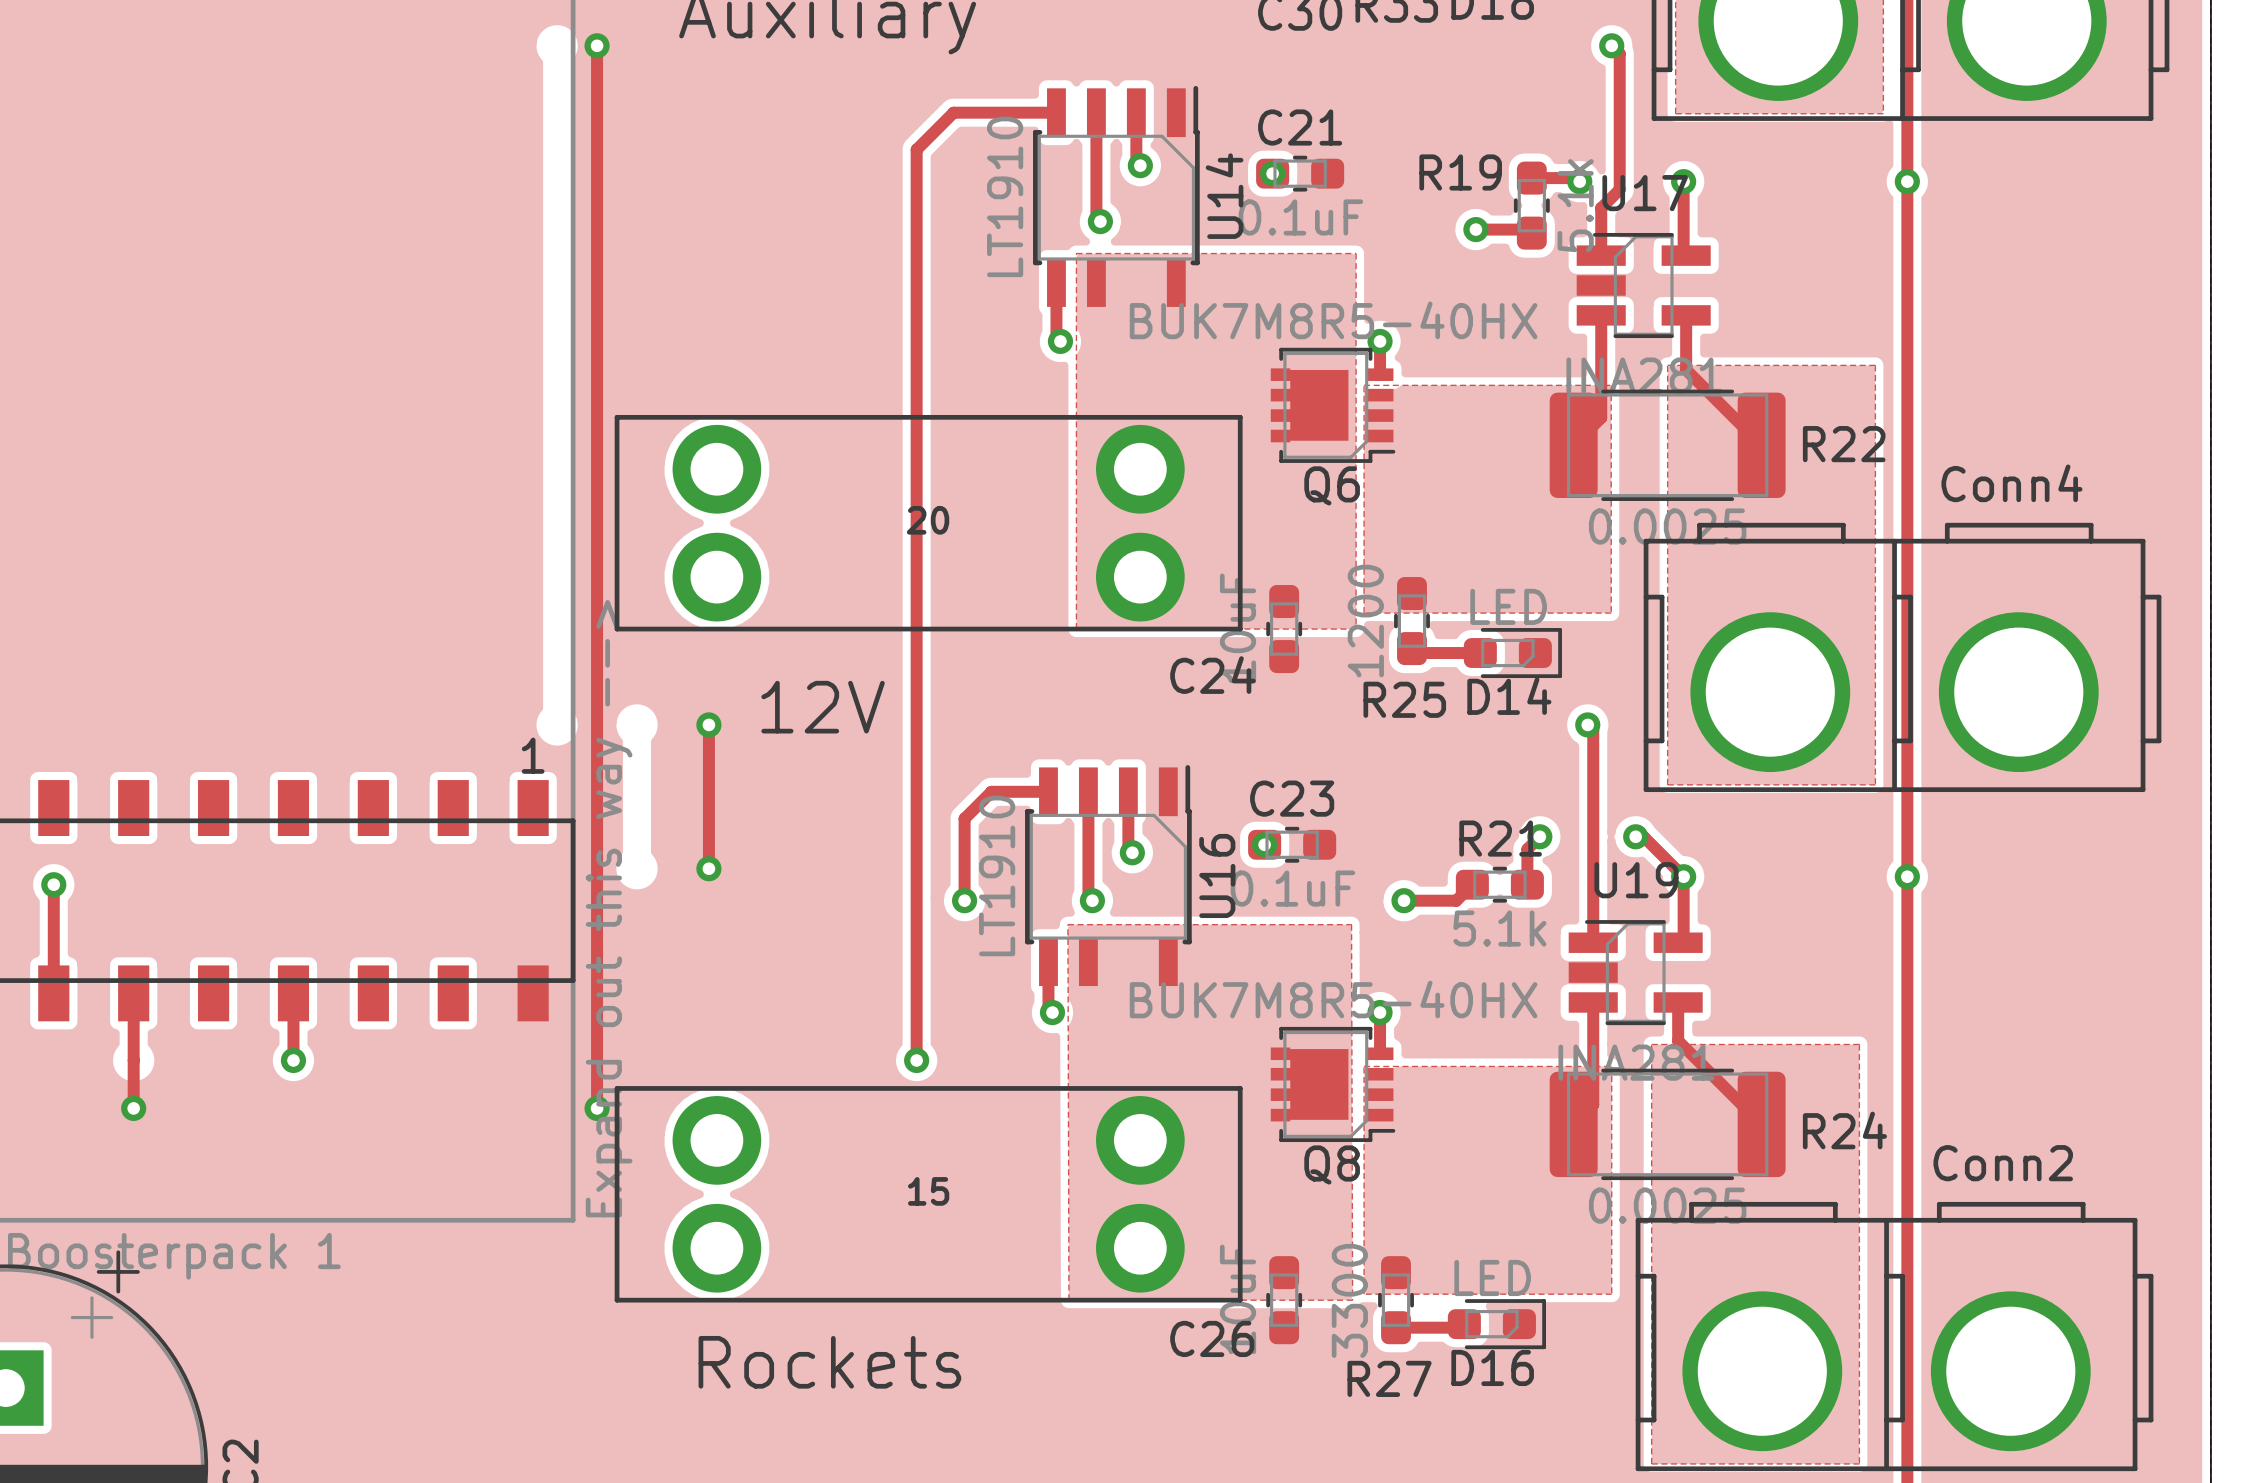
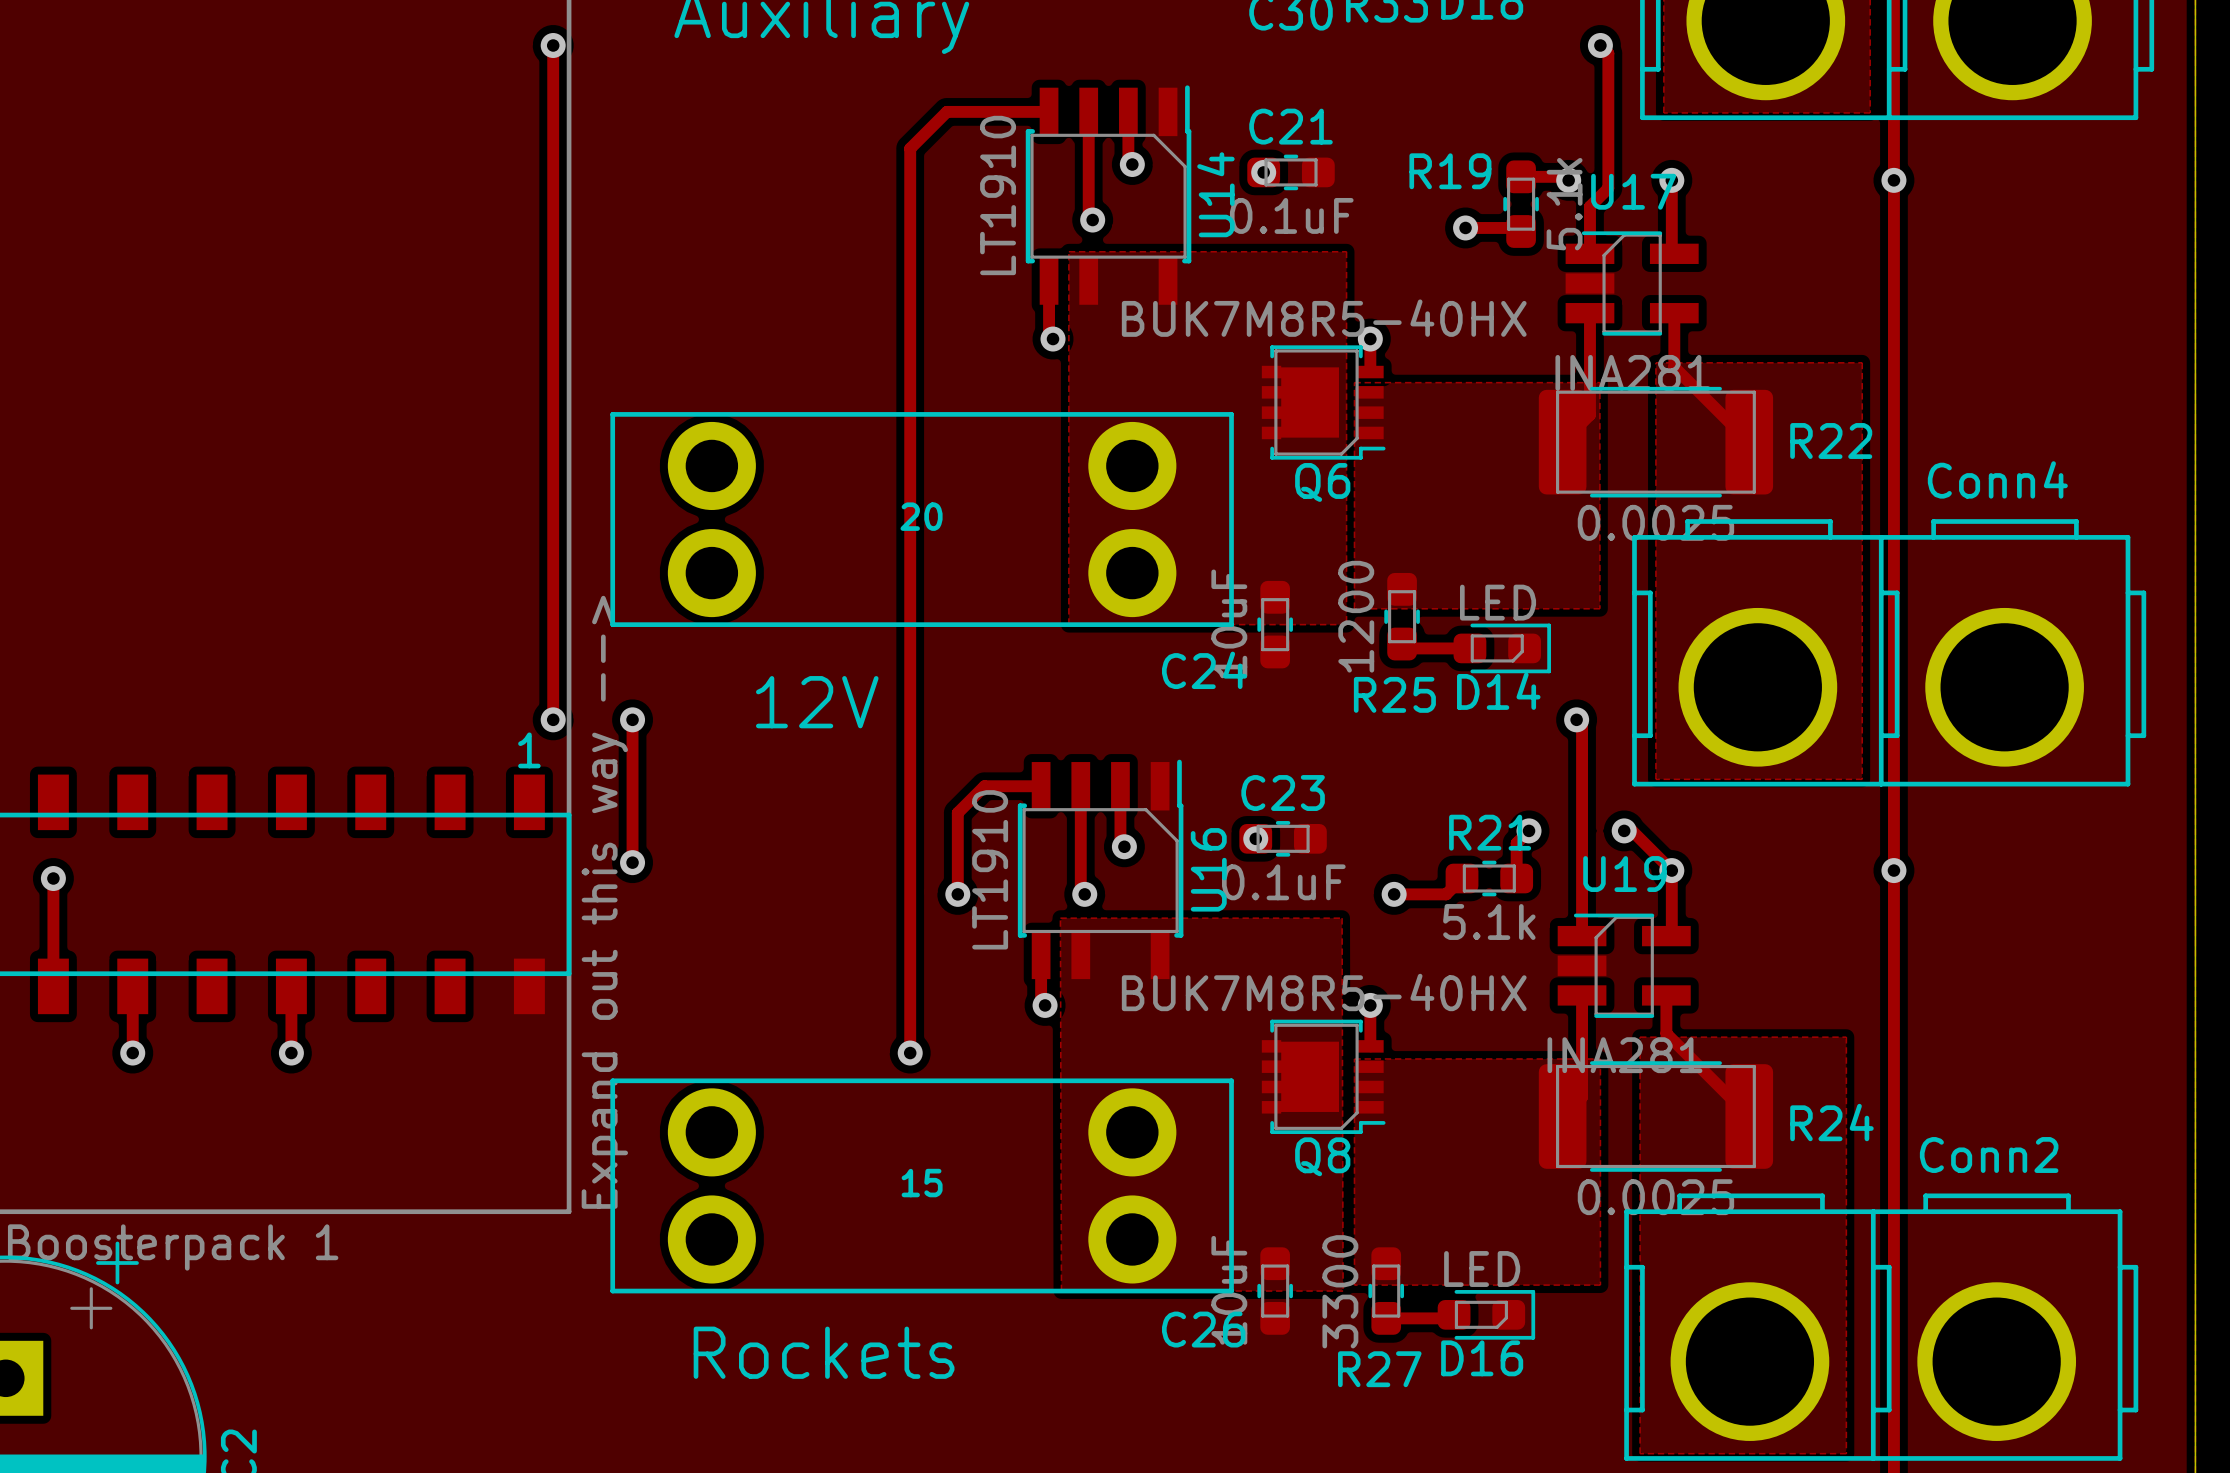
track: none -> (553, 45) (553, 719)
track: (597, 45) (597, 1108) -> none
via position: (597, 45) -> (553, 45)
via: none -> (553, 719)
track: (708, 724) (708, 868) -> (632, 719) (632, 862)
via position: (708, 724) -> (632, 719)
via position: (708, 868) -> (632, 862)
track: (133, 1060) (133, 1108) -> none
via position: (133, 1108) -> (132, 1053)
via: (597, 1108) -> none

